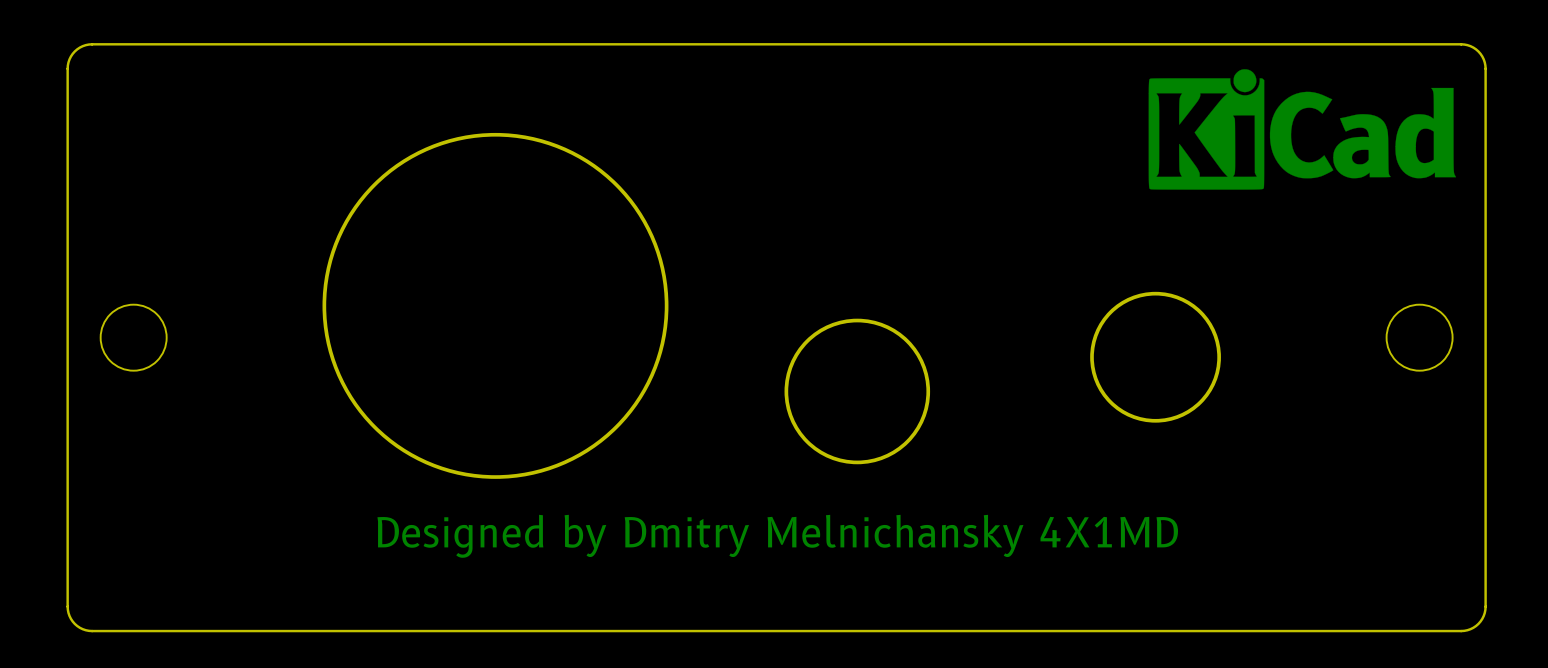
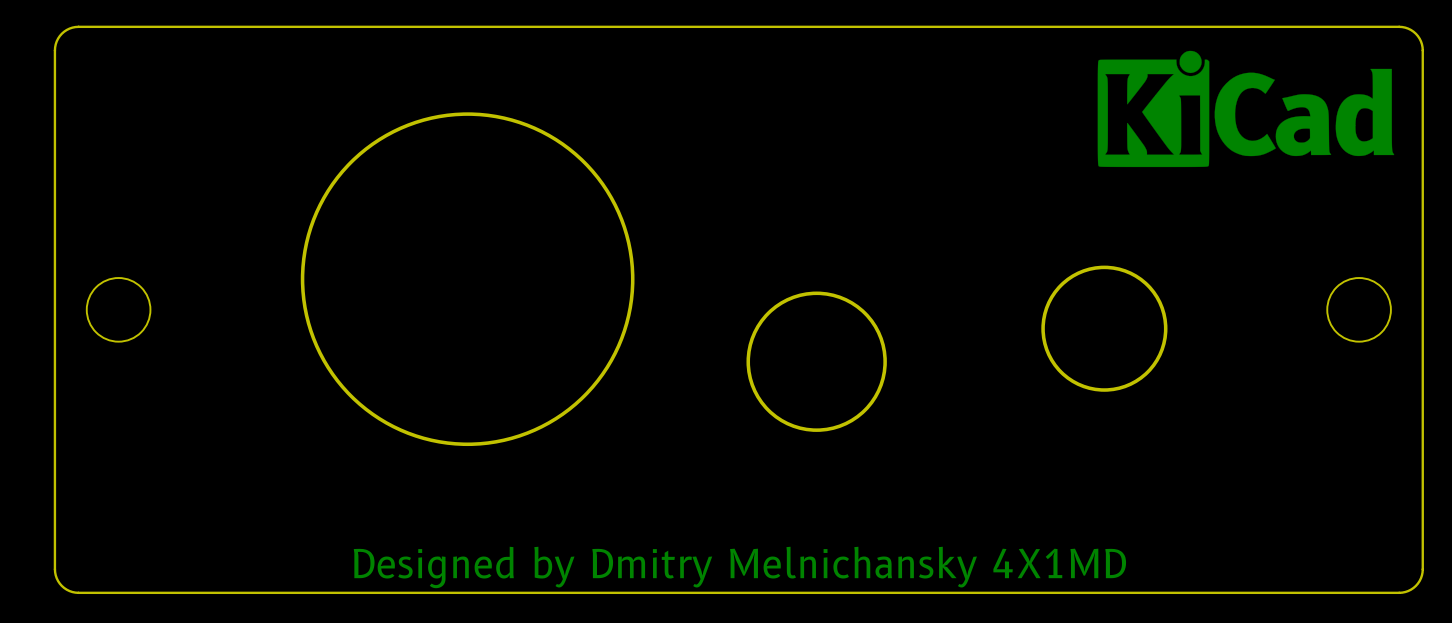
text position: Designed by Dmitry Melnichansky 4X1MD (777, 536) -> Designed by Dmitry Melnichansky 4X1MD (739, 567)

